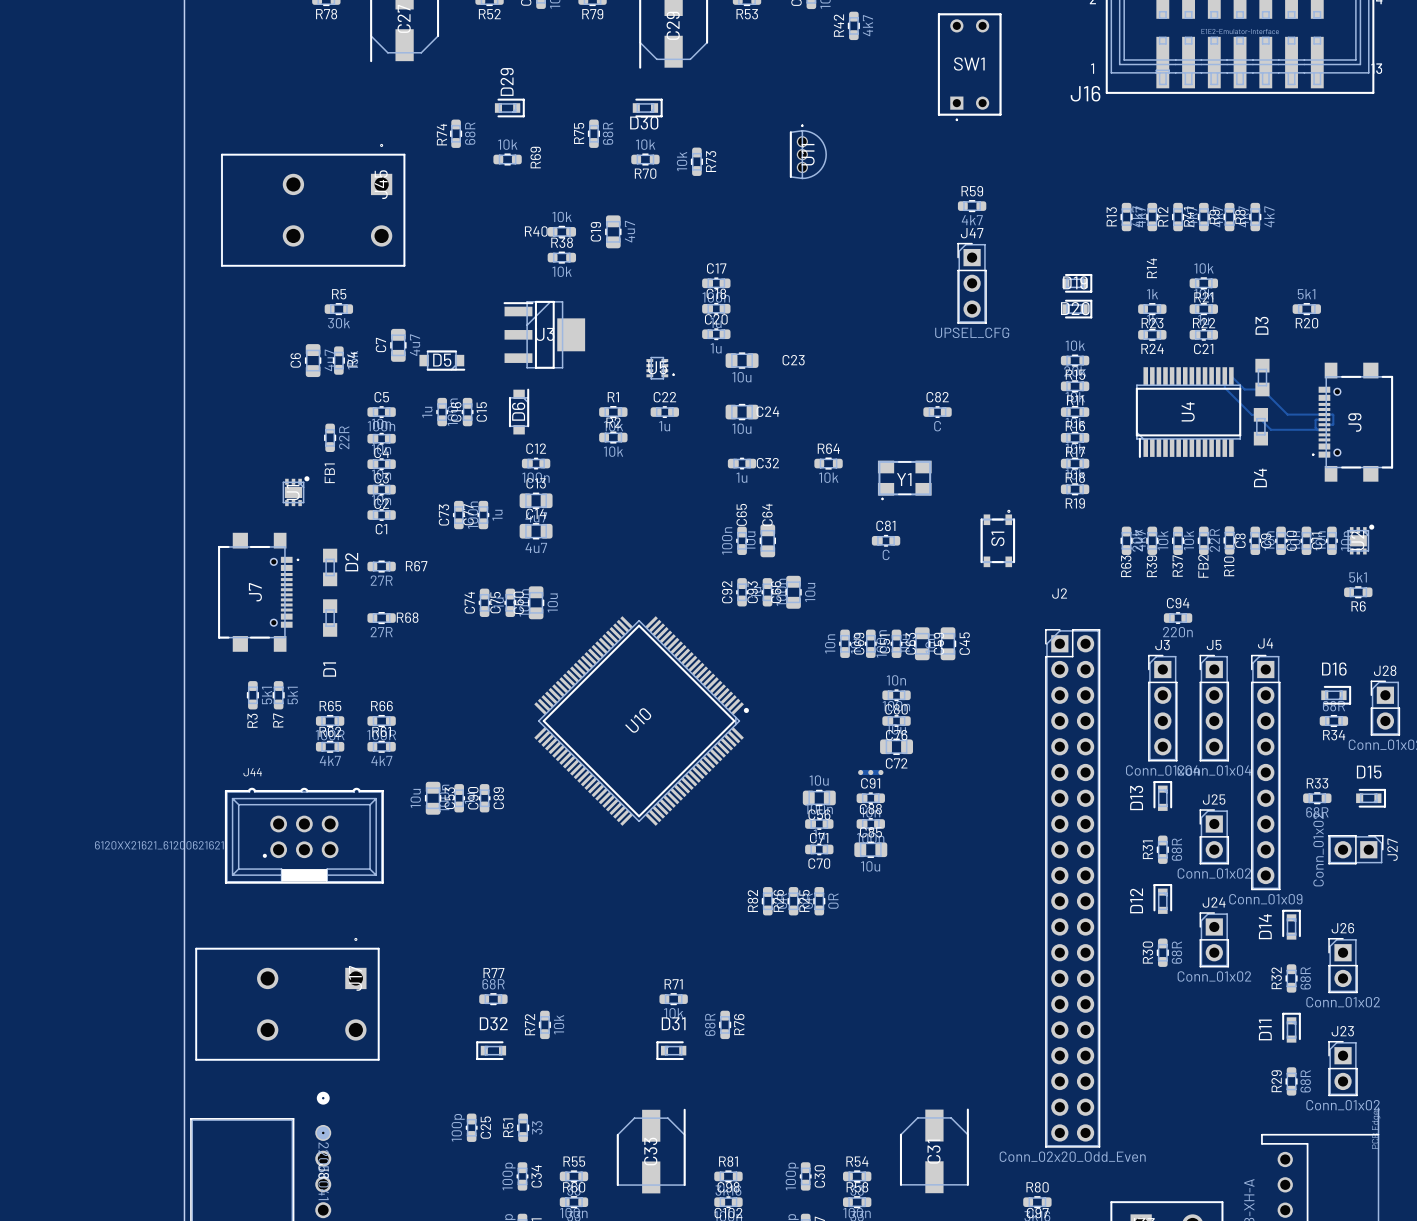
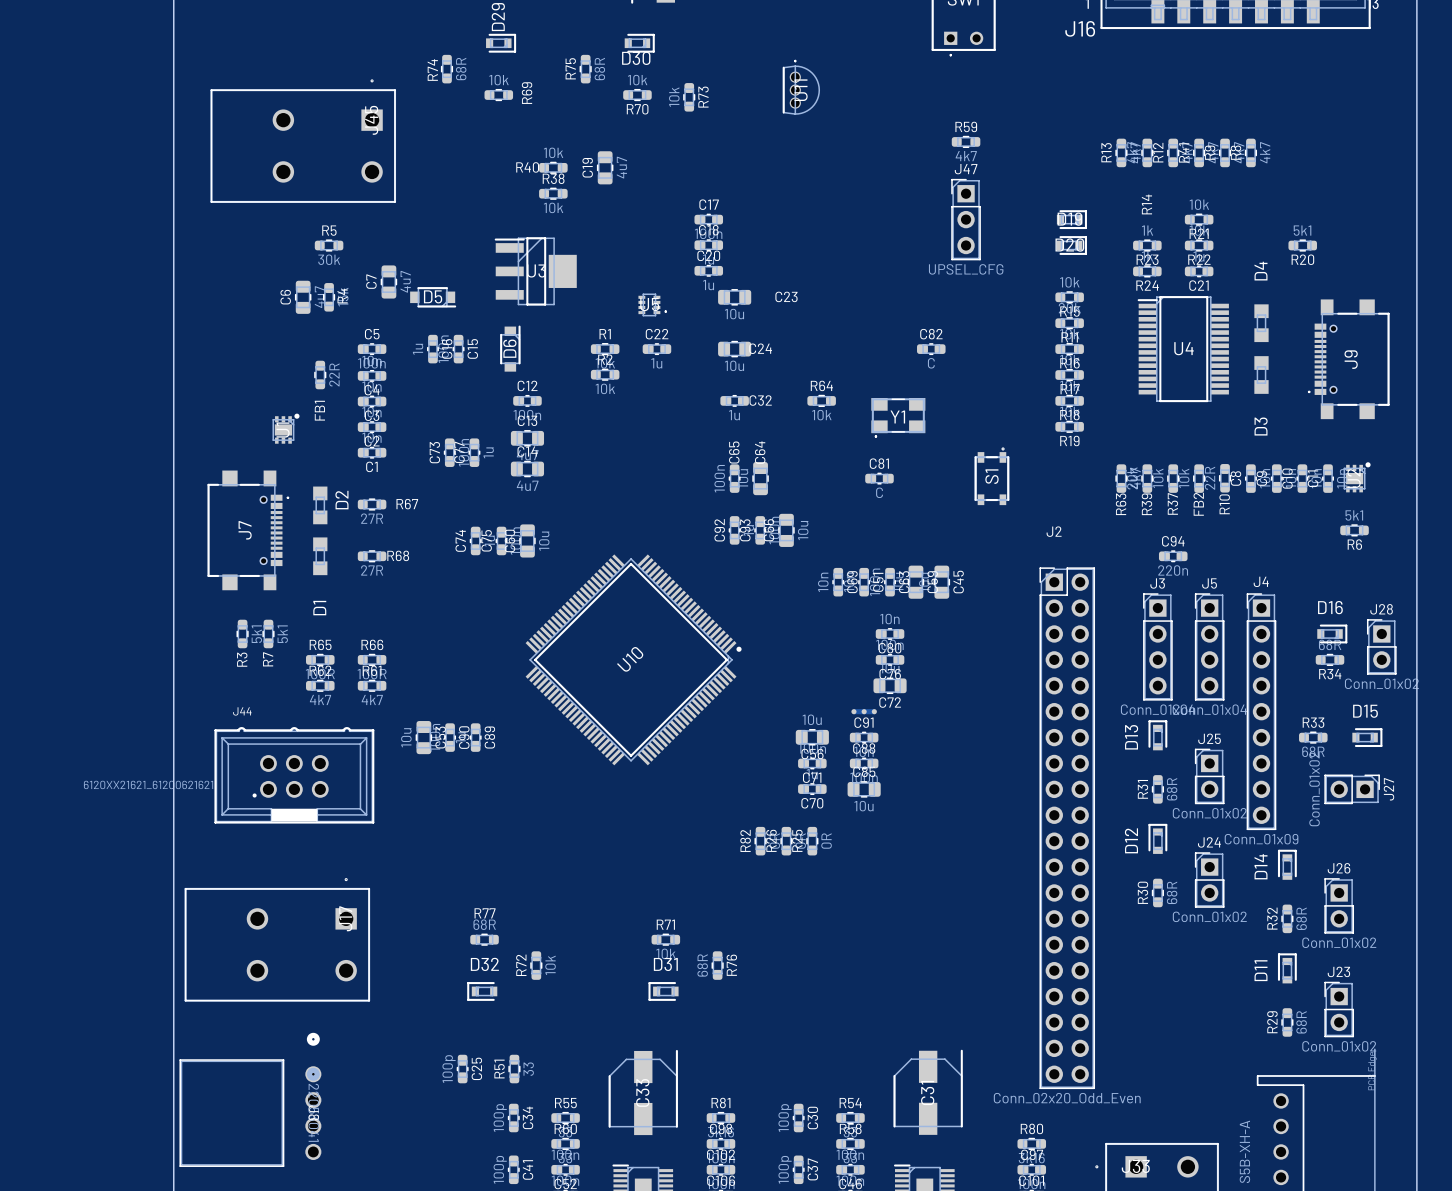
D3 name position: D3 (1262, 325) -> D3 (1261, 426)
track: (1224, 376) (1224, 387) (1251, 414) (1260, 414) (1260, 419) (1271, 429) (1324, 429) -> none
track: (1231, 376) (1244, 389) (1262, 389) (1287, 414) (1332, 414) (1333, 424) (1324, 424) -> none
D3 position: (1262, 377) -> (1261, 375)
U4 rotation: 0° (1188, 412) -> 90° clockwise (1183, 349)
track: (1324, 419) (1315, 420) (1315, 427) (1317, 430) -> none
D4 position: (1260, 426) -> (1261, 323)
D4 name position: D4 (1260, 477) -> D4 (1261, 271)

